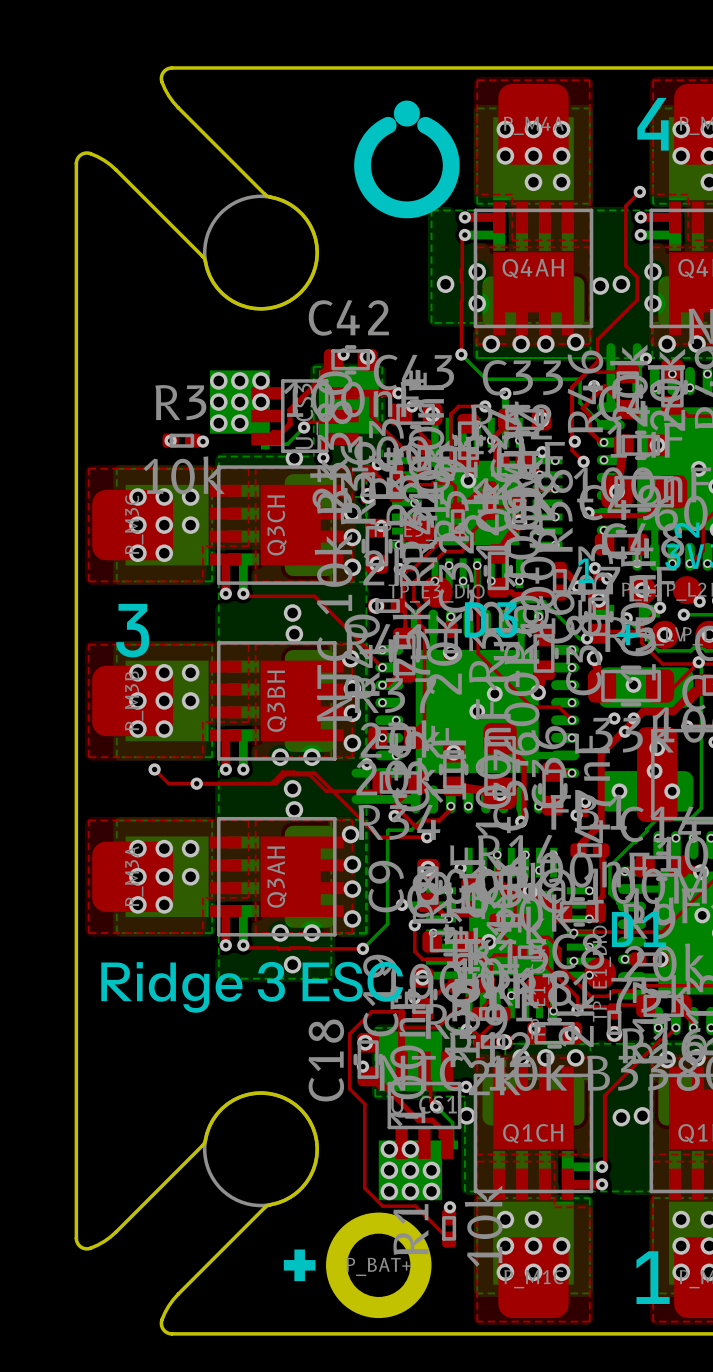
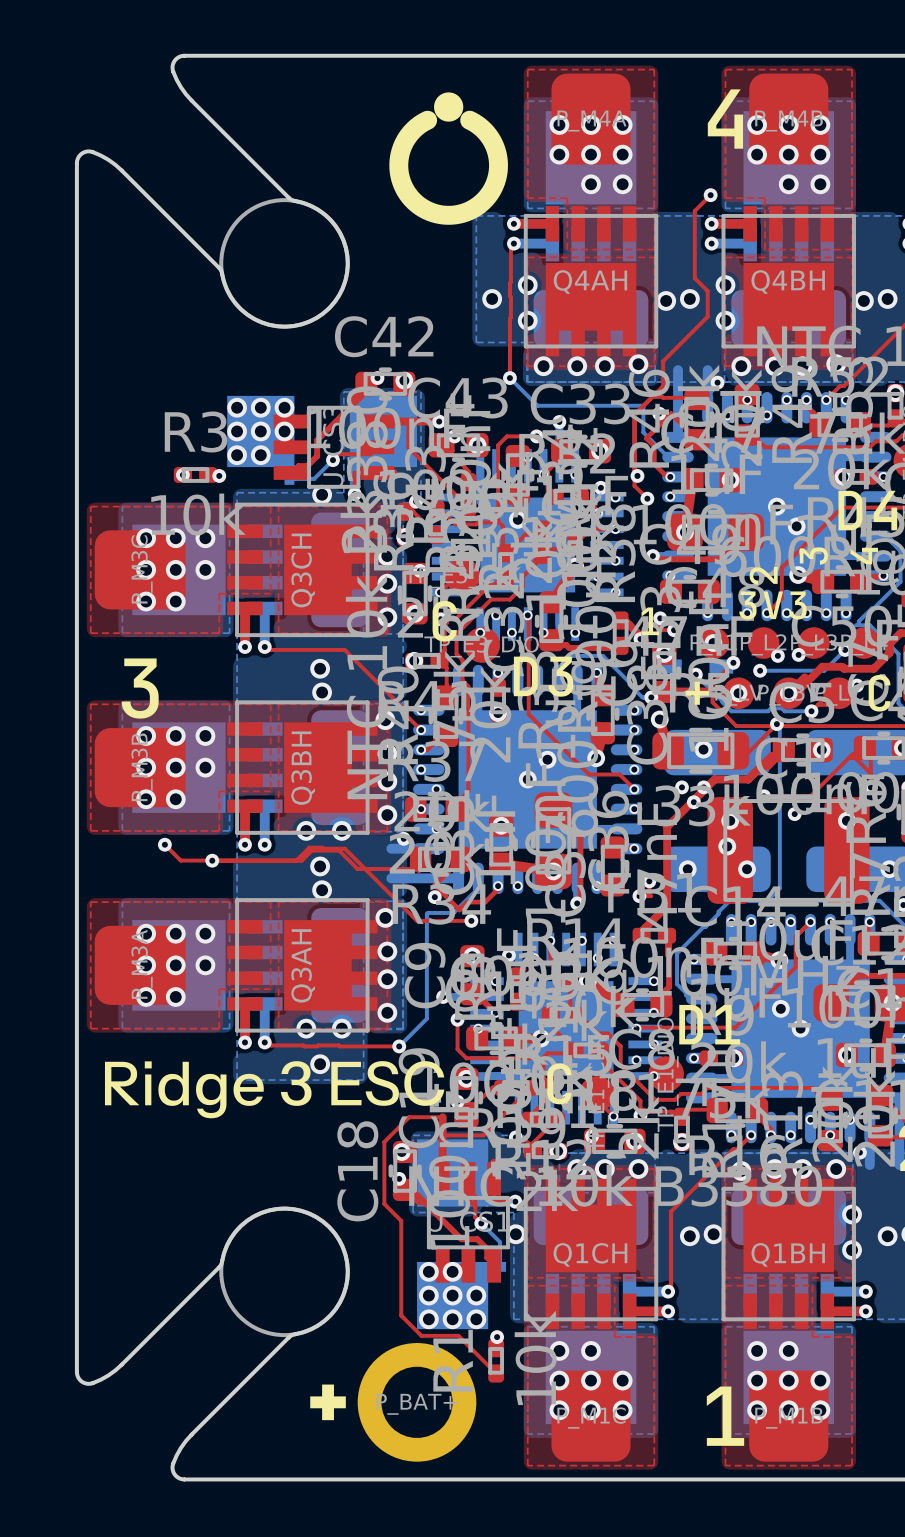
drawing: none -> [432, 600, 457, 642]
drawing: none -> [547, 1063, 572, 1105]

